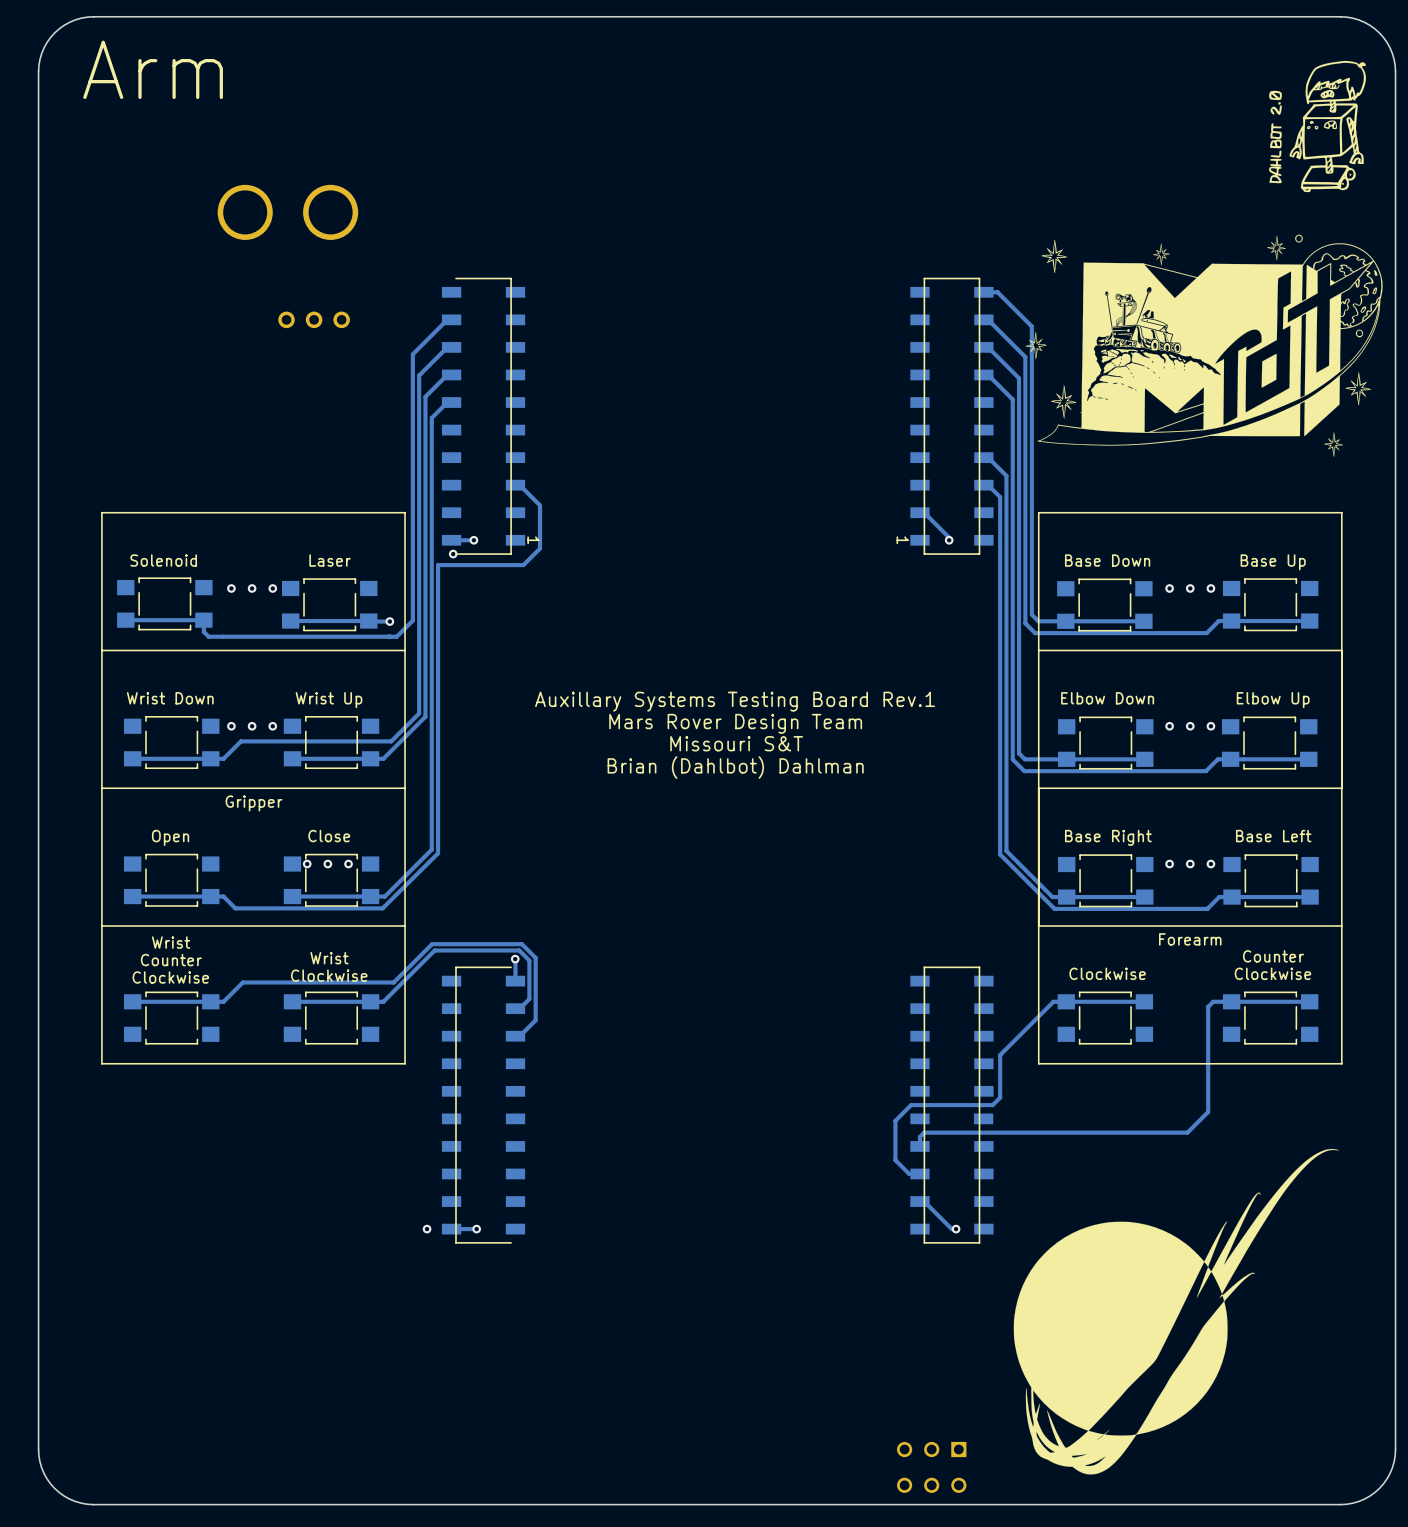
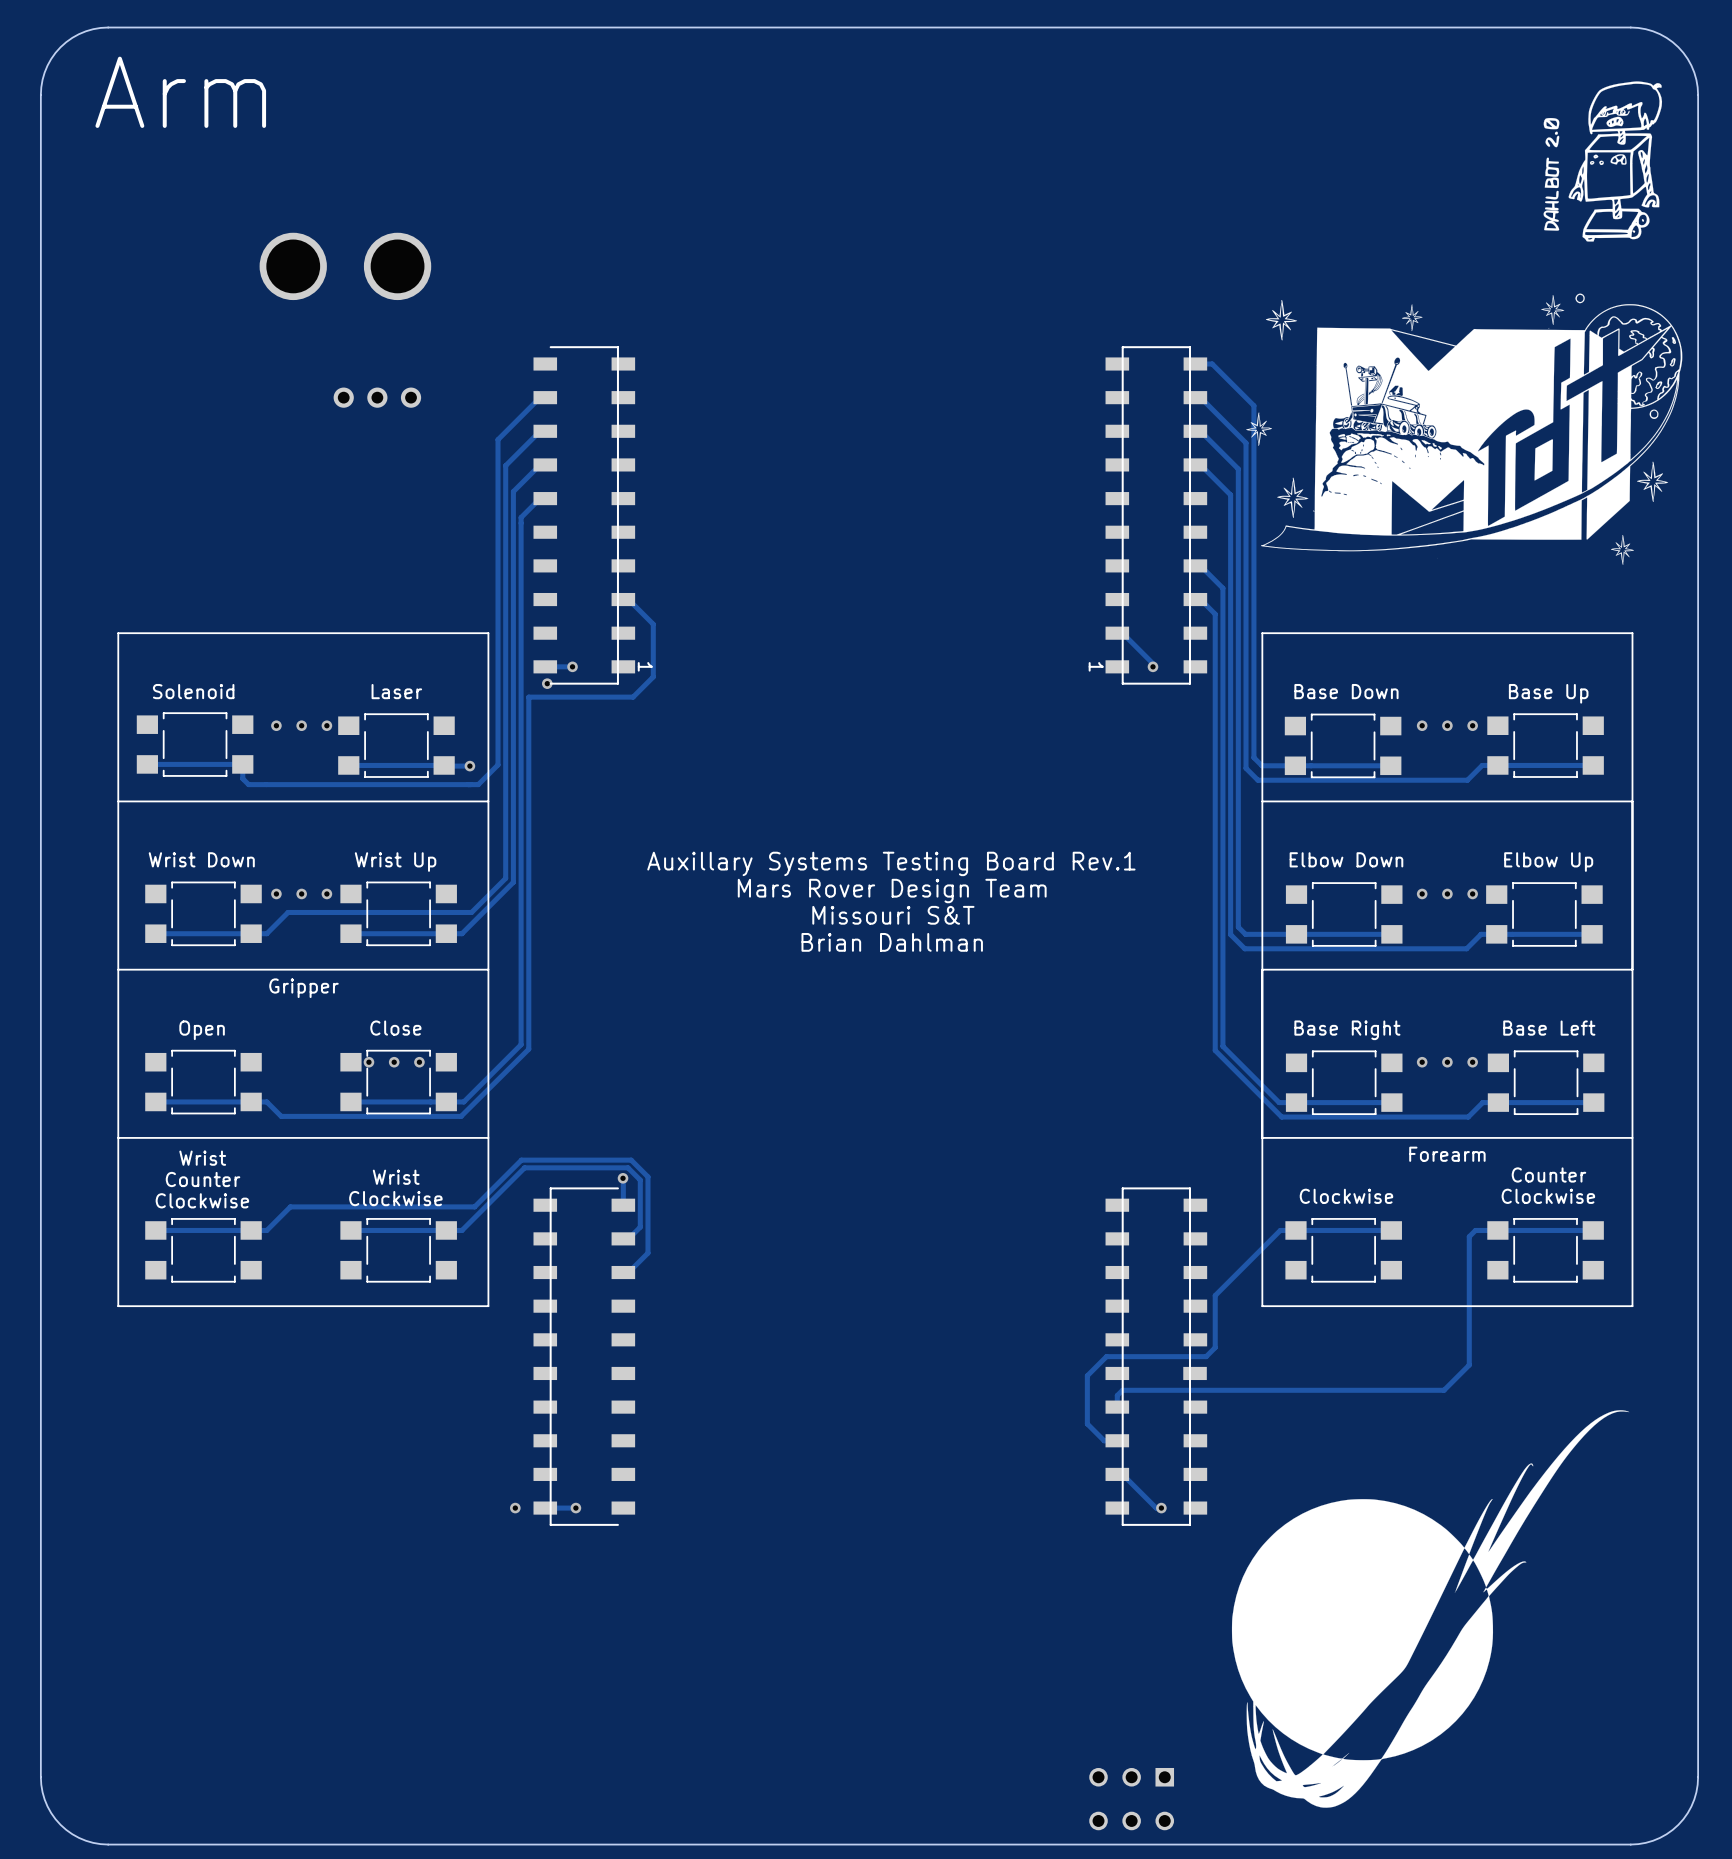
text: Brian (Dahlbot) Dahlman (735, 767) -> Brian Dahlman (892, 942)

